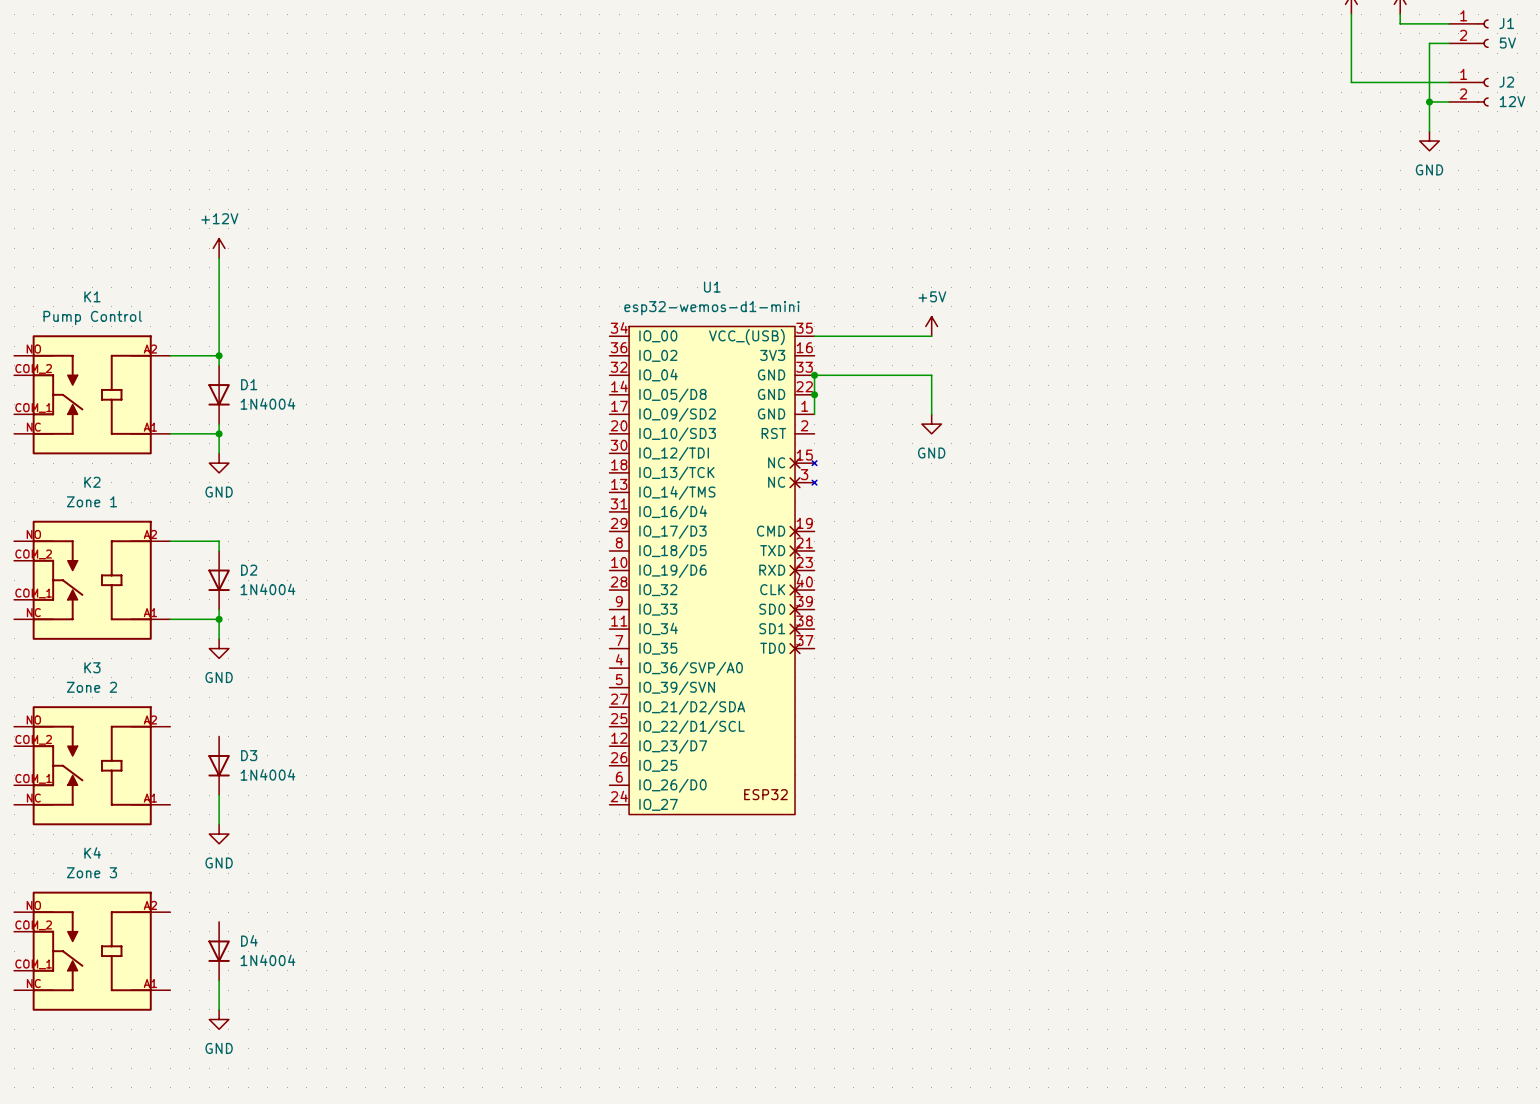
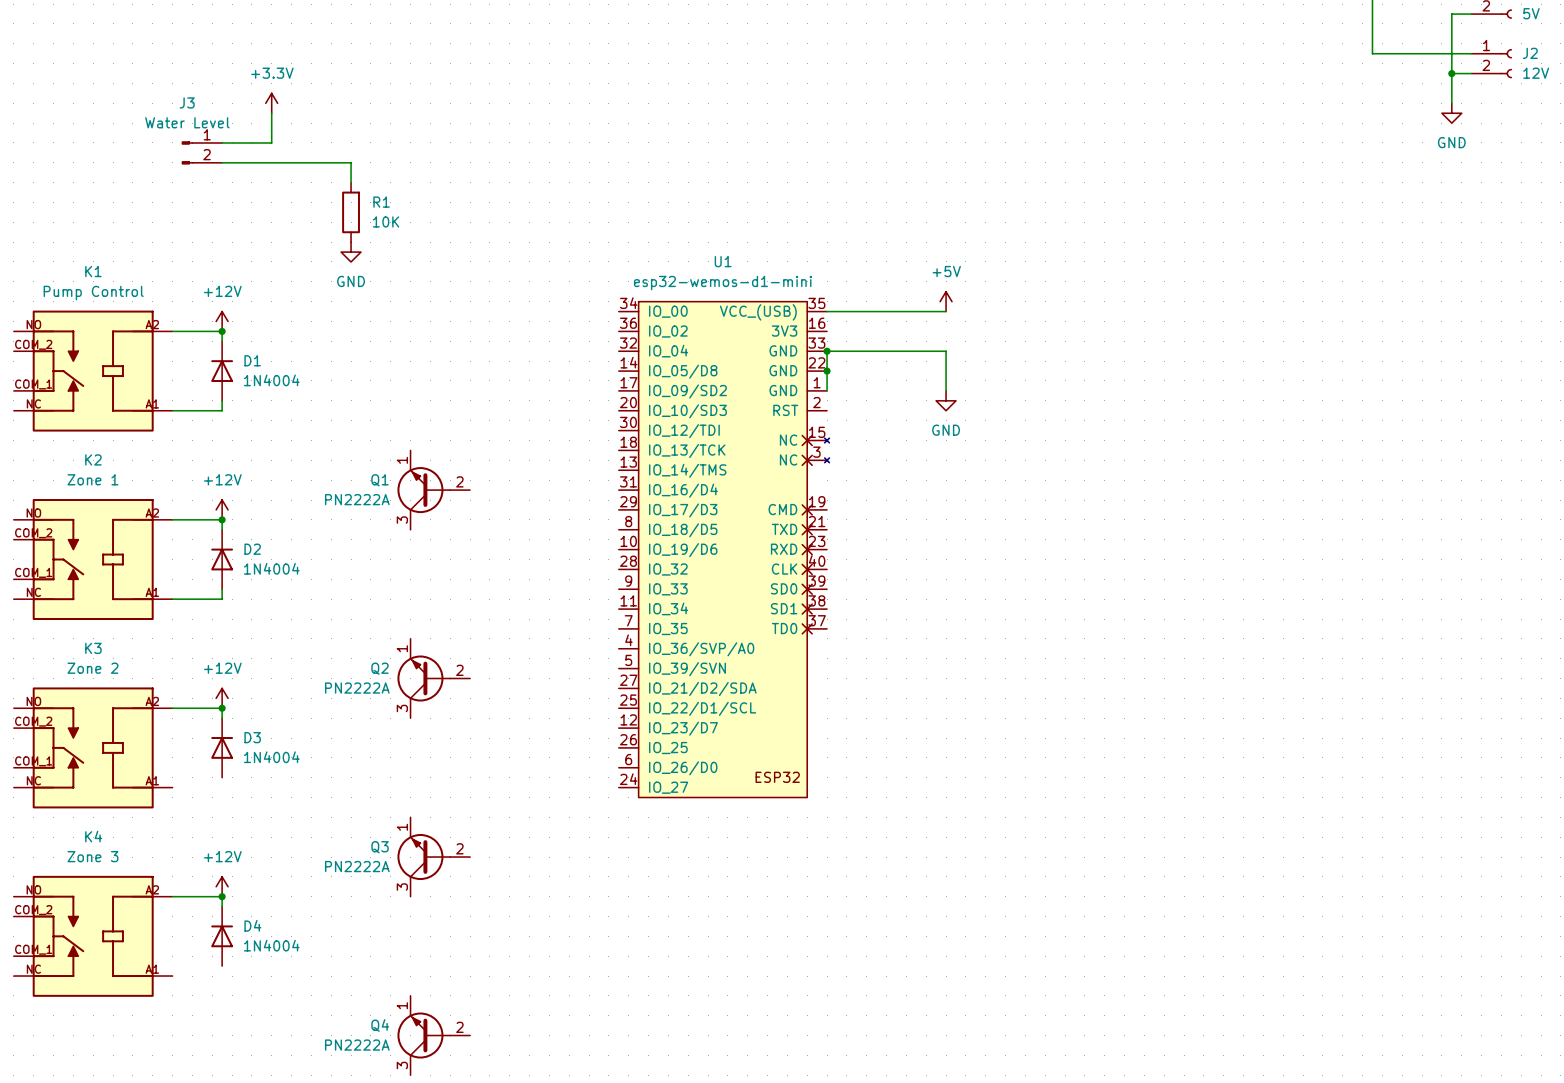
power symbol: none -> +3.3V (271, 103)
wire: none -> (271, 113) (271, 142) (222, 142)
J3: none -> Water Level (201, 152)
wire: none -> (222, 162) (351, 162) (351, 182)
R1: none -> 10K (351, 212)
power symbol position: +12V (219, 248) -> +12V (222, 321)
wire: (219, 258) (219, 355) -> none
power symbol: none -> GND (351, 252)
D1 rotation: 0° (219, 394) -> 180° (222, 371)
wire: (219, 433) (219, 453) -> none
junction: (219, 433) -> none
power symbol: GND (219, 463) -> none
Q1: none -> PN2222A (433, 490)
power symbol: none -> +12V (222, 509)
junction: none -> (222, 519)
D2 rotation: 0° (219, 580) -> 180° (222, 559)
wire: (219, 619) (219, 638) -> none
junction: (219, 619) -> none
power symbol: GND (219, 648) -> none
Q2: none -> PN2222A (433, 678)
power symbol: none -> +12V (222, 698)
wire: none -> (172, 708) (222, 708) (222, 718)
junction: none -> (222, 708)
D3 rotation: 0° (219, 765) -> 180° (222, 747)
wire: (219, 795) (219, 824) -> none
power symbol: GND (219, 834) -> none
Q3: none -> PN2222A (433, 857)
power symbol: none -> +12V (222, 886)
wire: none -> (172, 896) (222, 896) (222, 906)
junction: none -> (222, 896)
D4 rotation: 0° (219, 951) -> 180° (222, 936)
wire: (219, 980) (219, 1009) -> none
power symbol: GND (219, 1019) -> none
Q4: none -> PN2222A (433, 1035)

